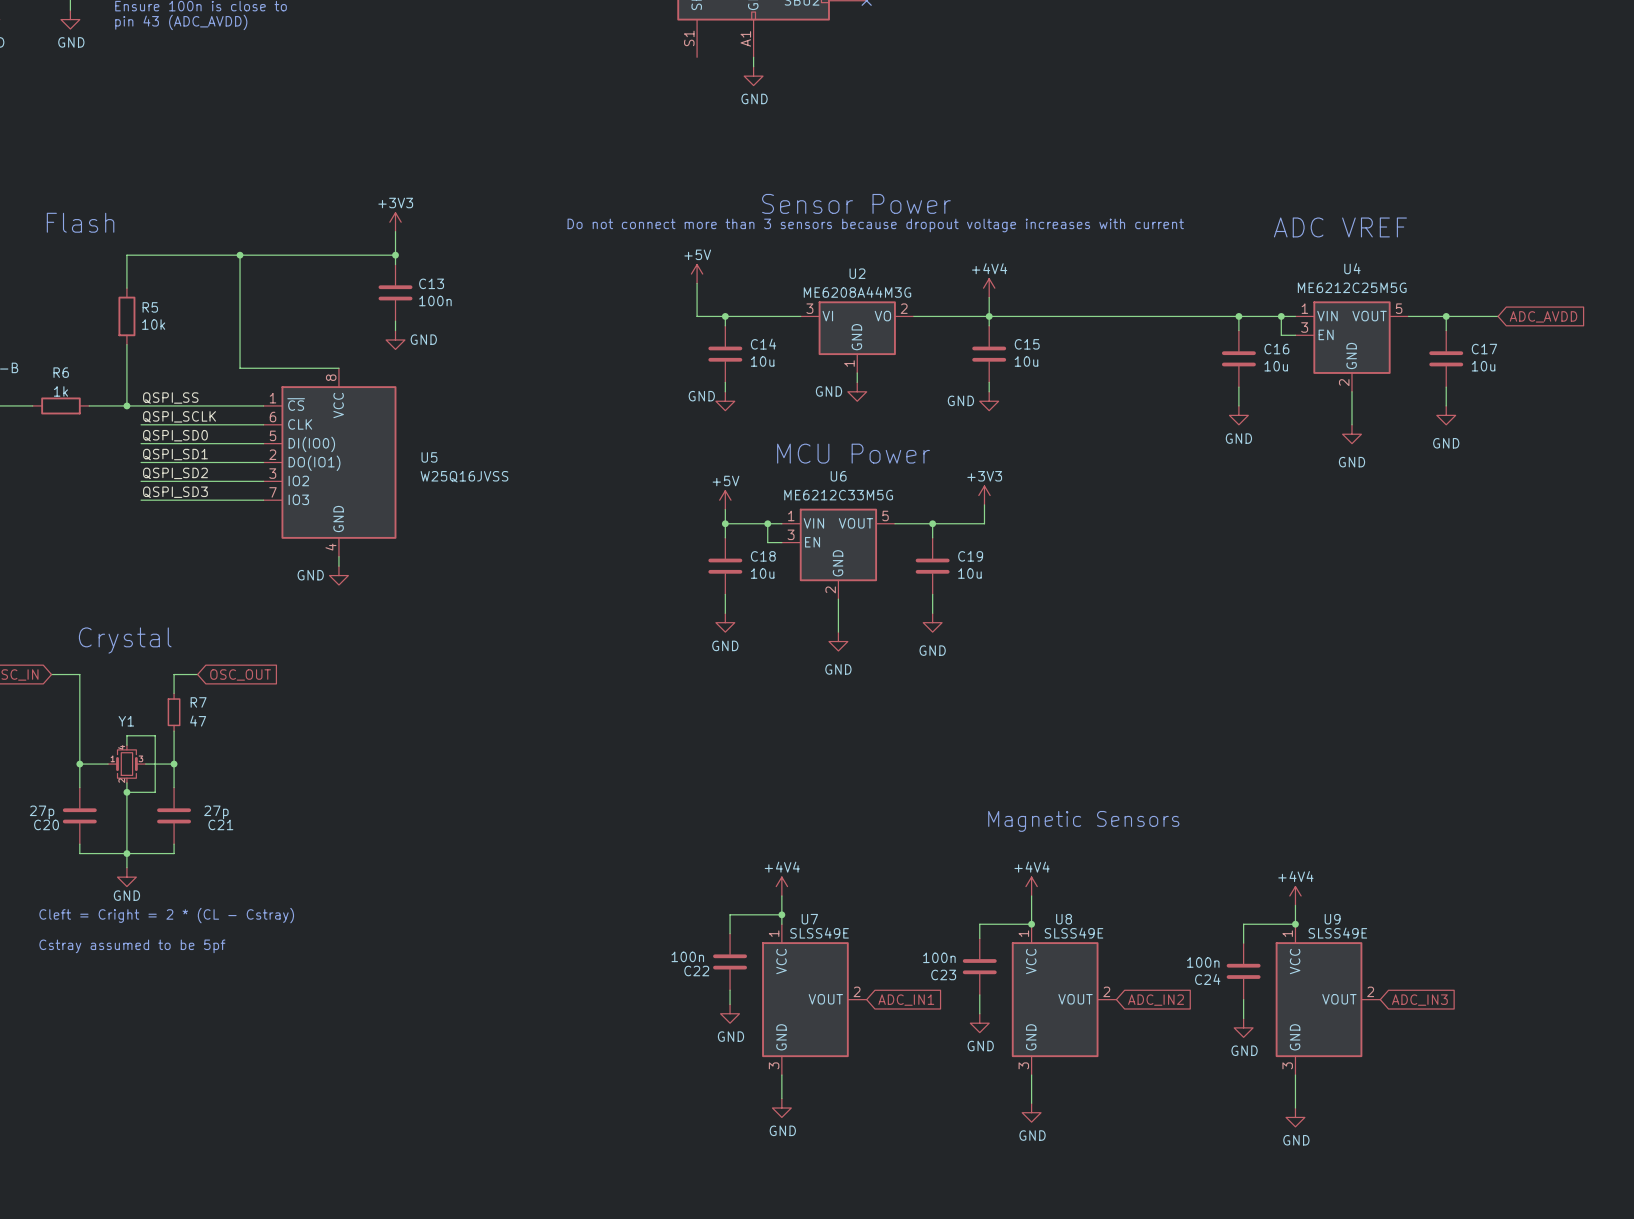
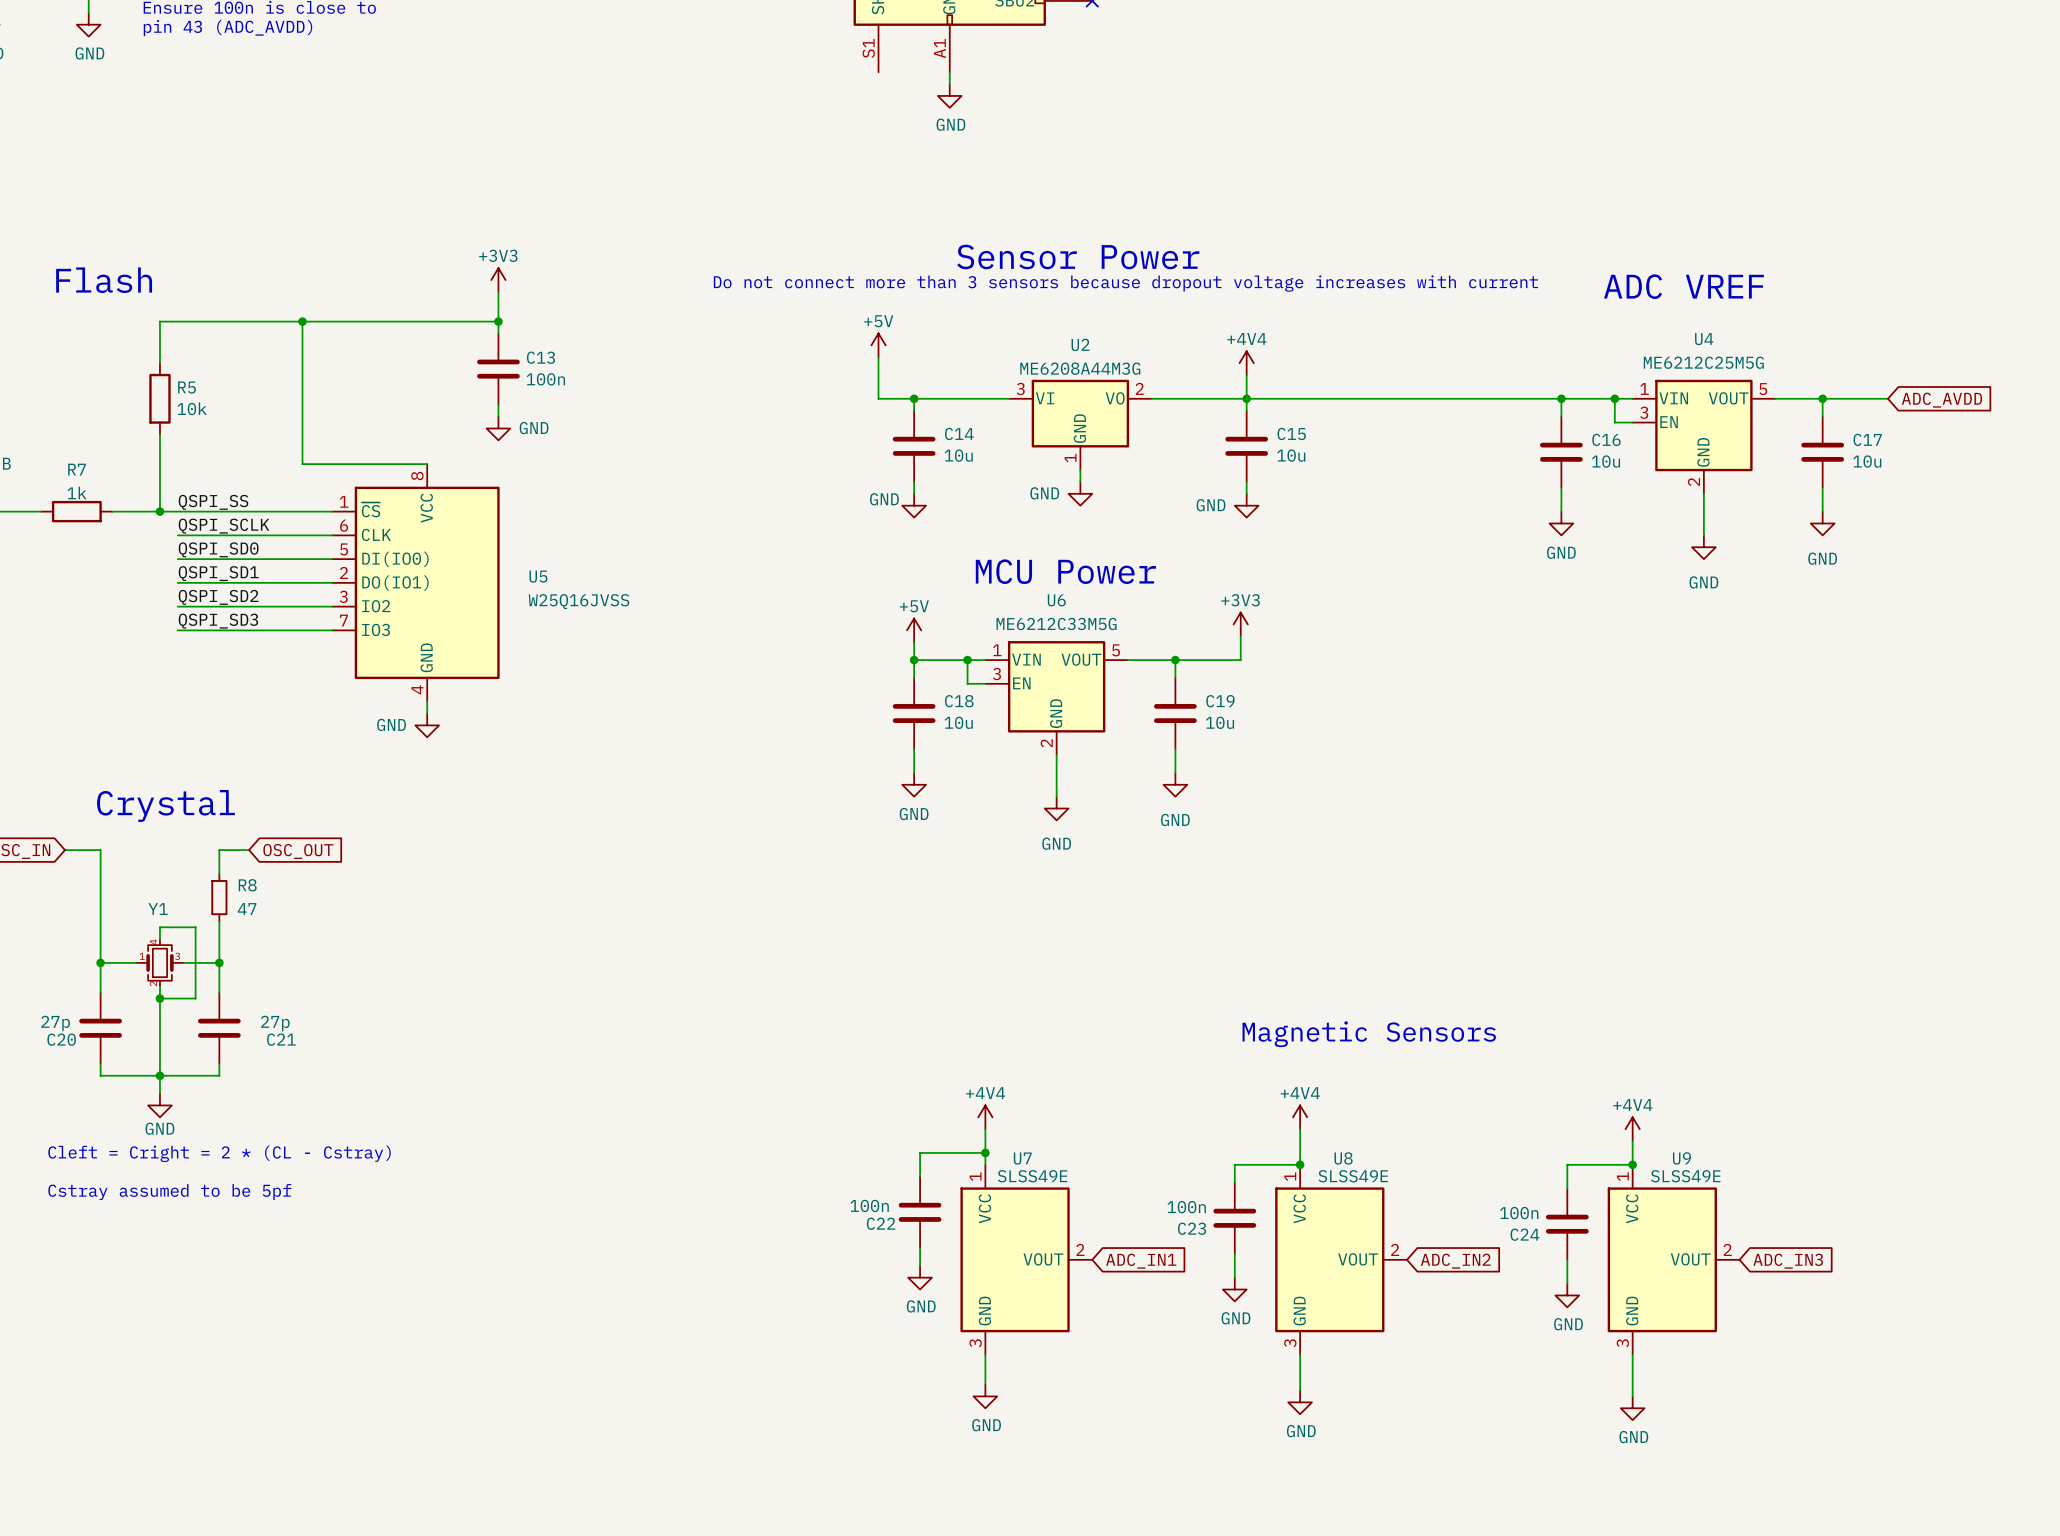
R6 name: R6 (61, 372) -> R7 (77, 469)
R7 name: R7 (198, 702) -> R8 (247, 885)

